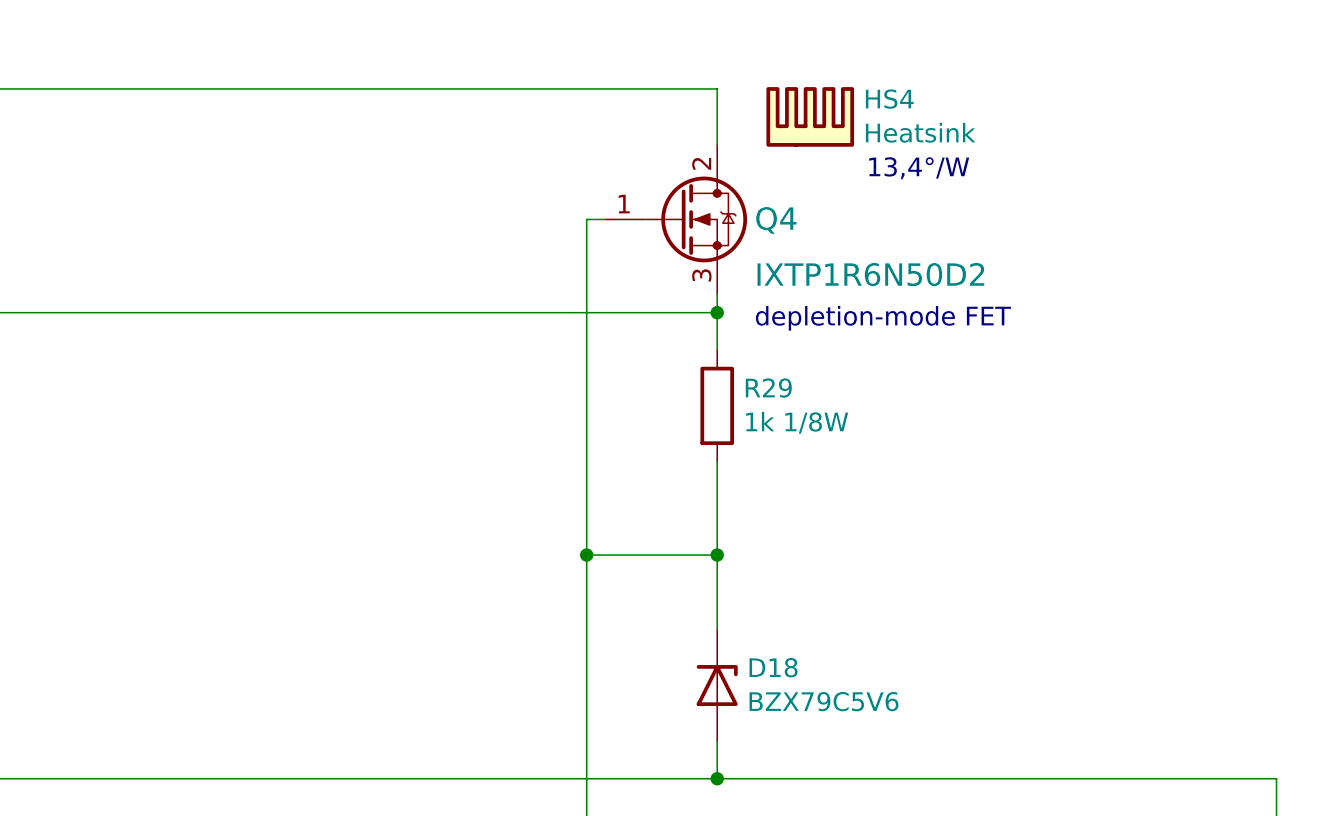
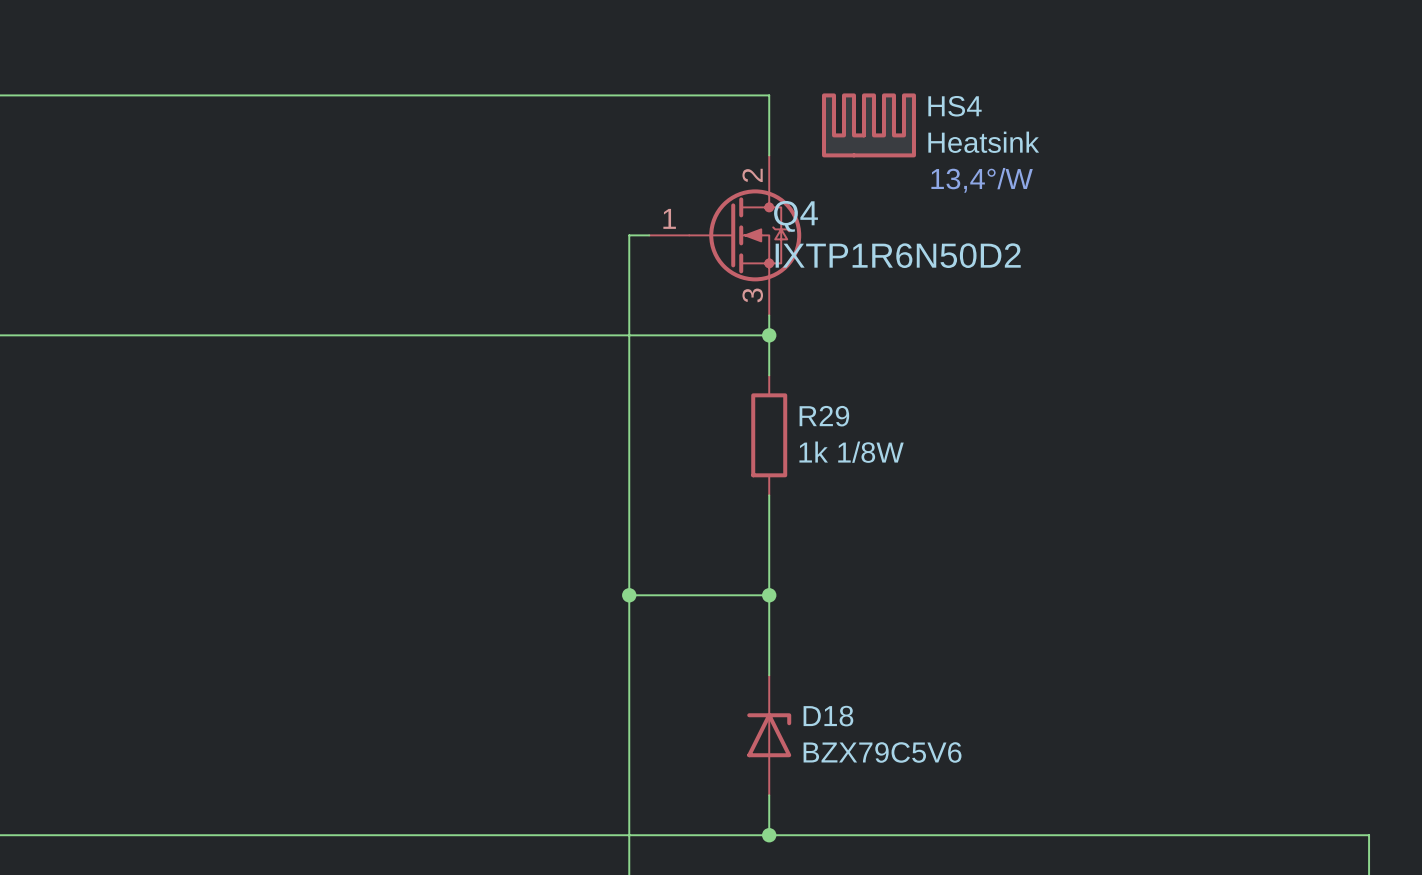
Q4 name position: Q4 (776, 220) -> Q4 (796, 216)
Q4 value position: IXTP1R6N50D2 (870, 274) -> IXTP1R6N50D2 (898, 255)
text: depletion-mode FET (883, 318) -> none

